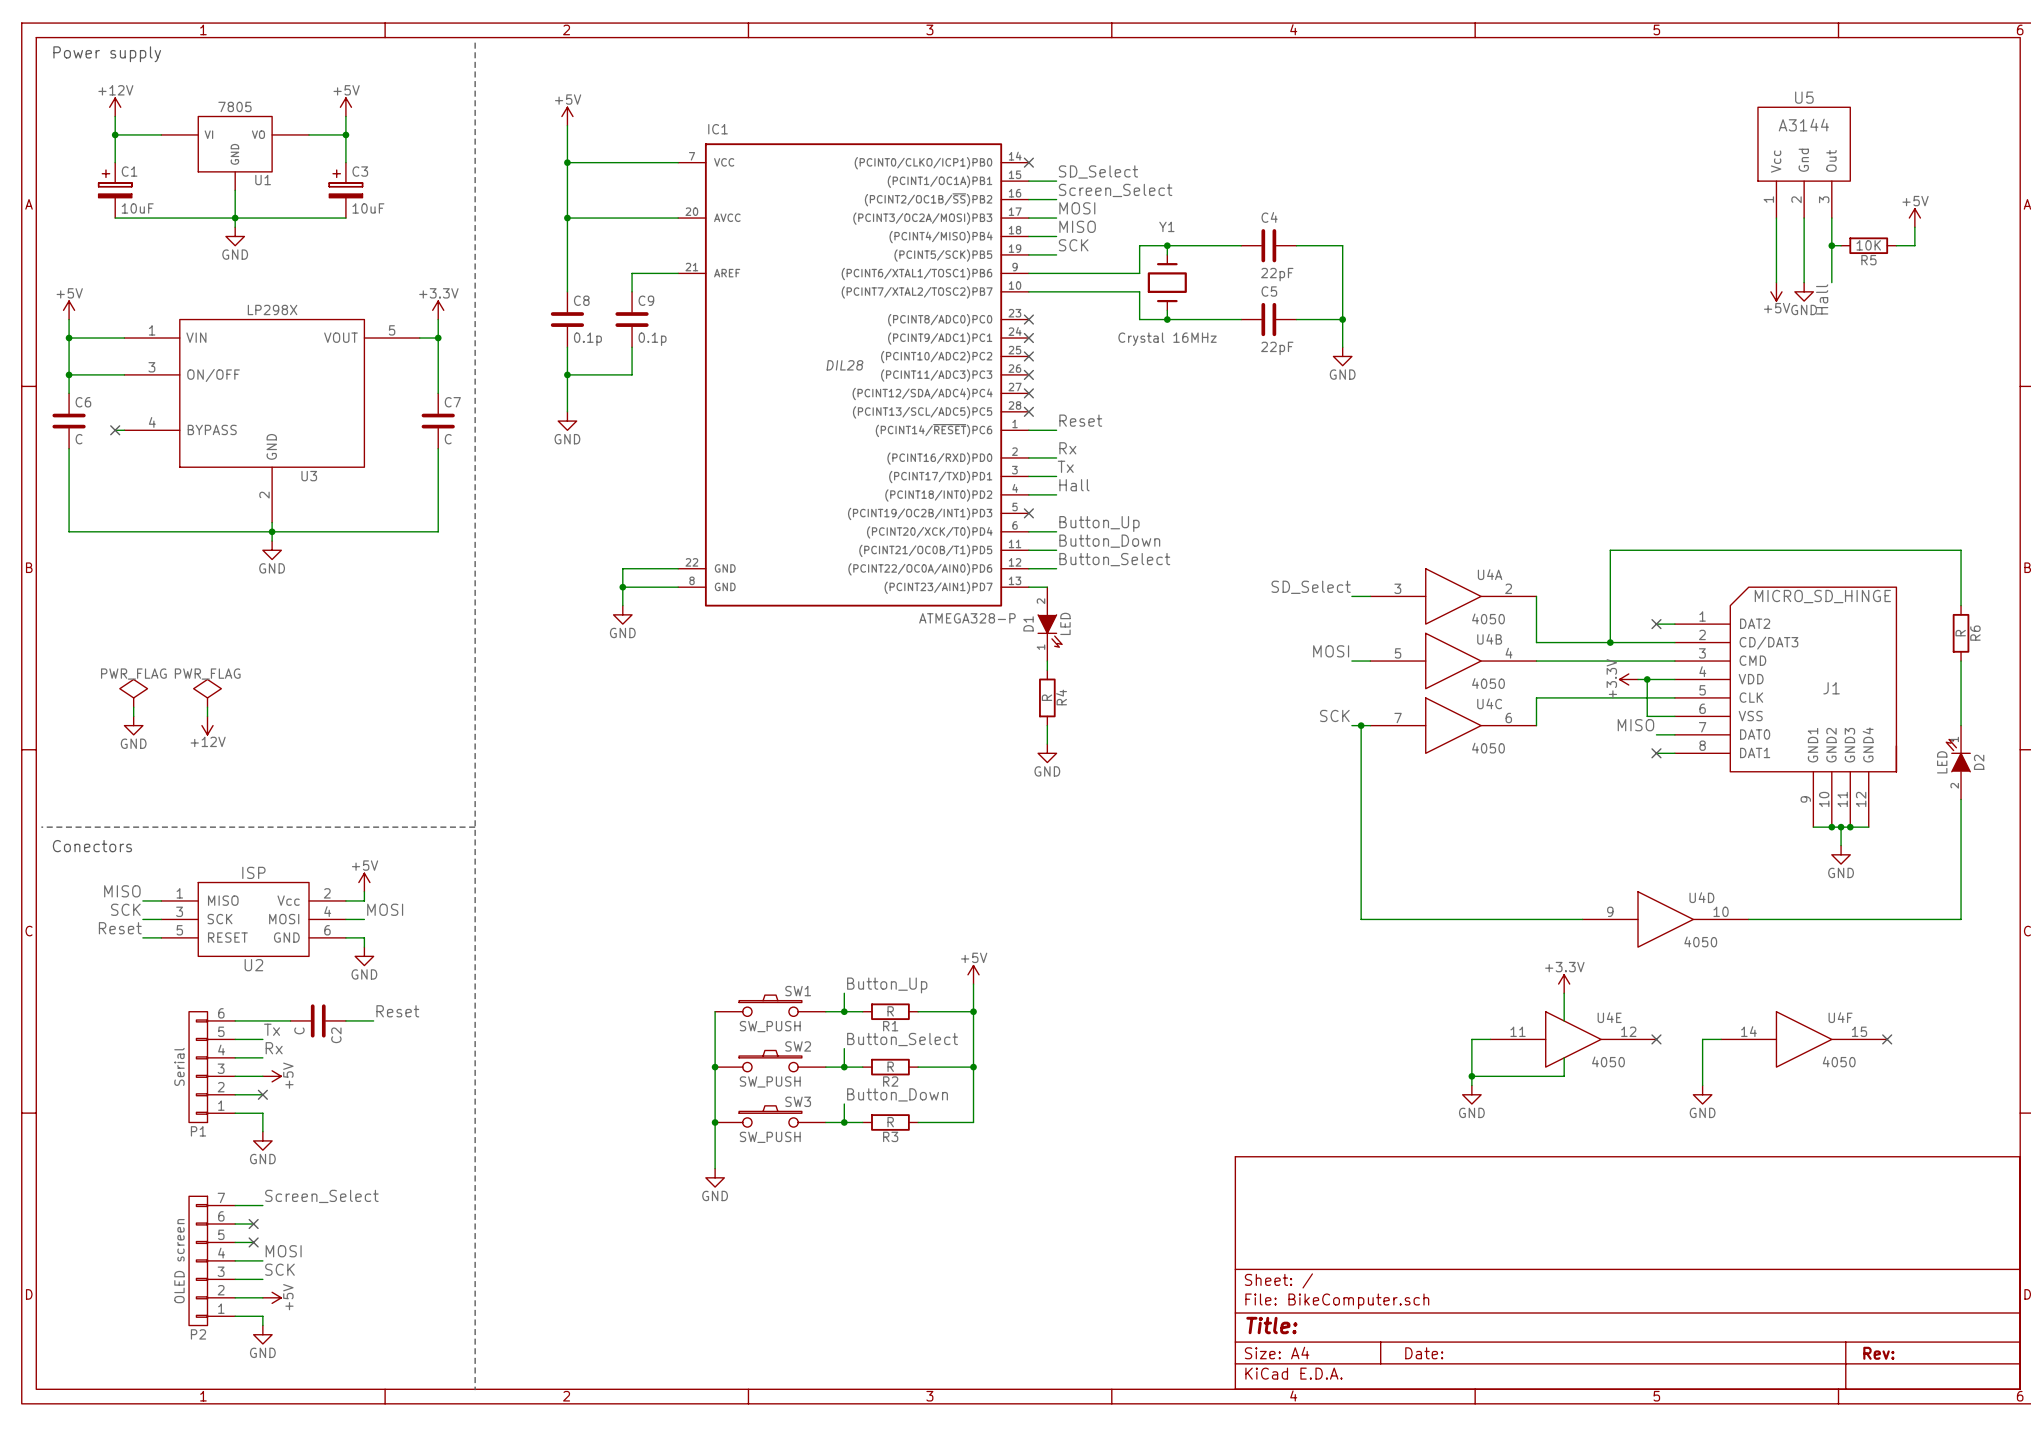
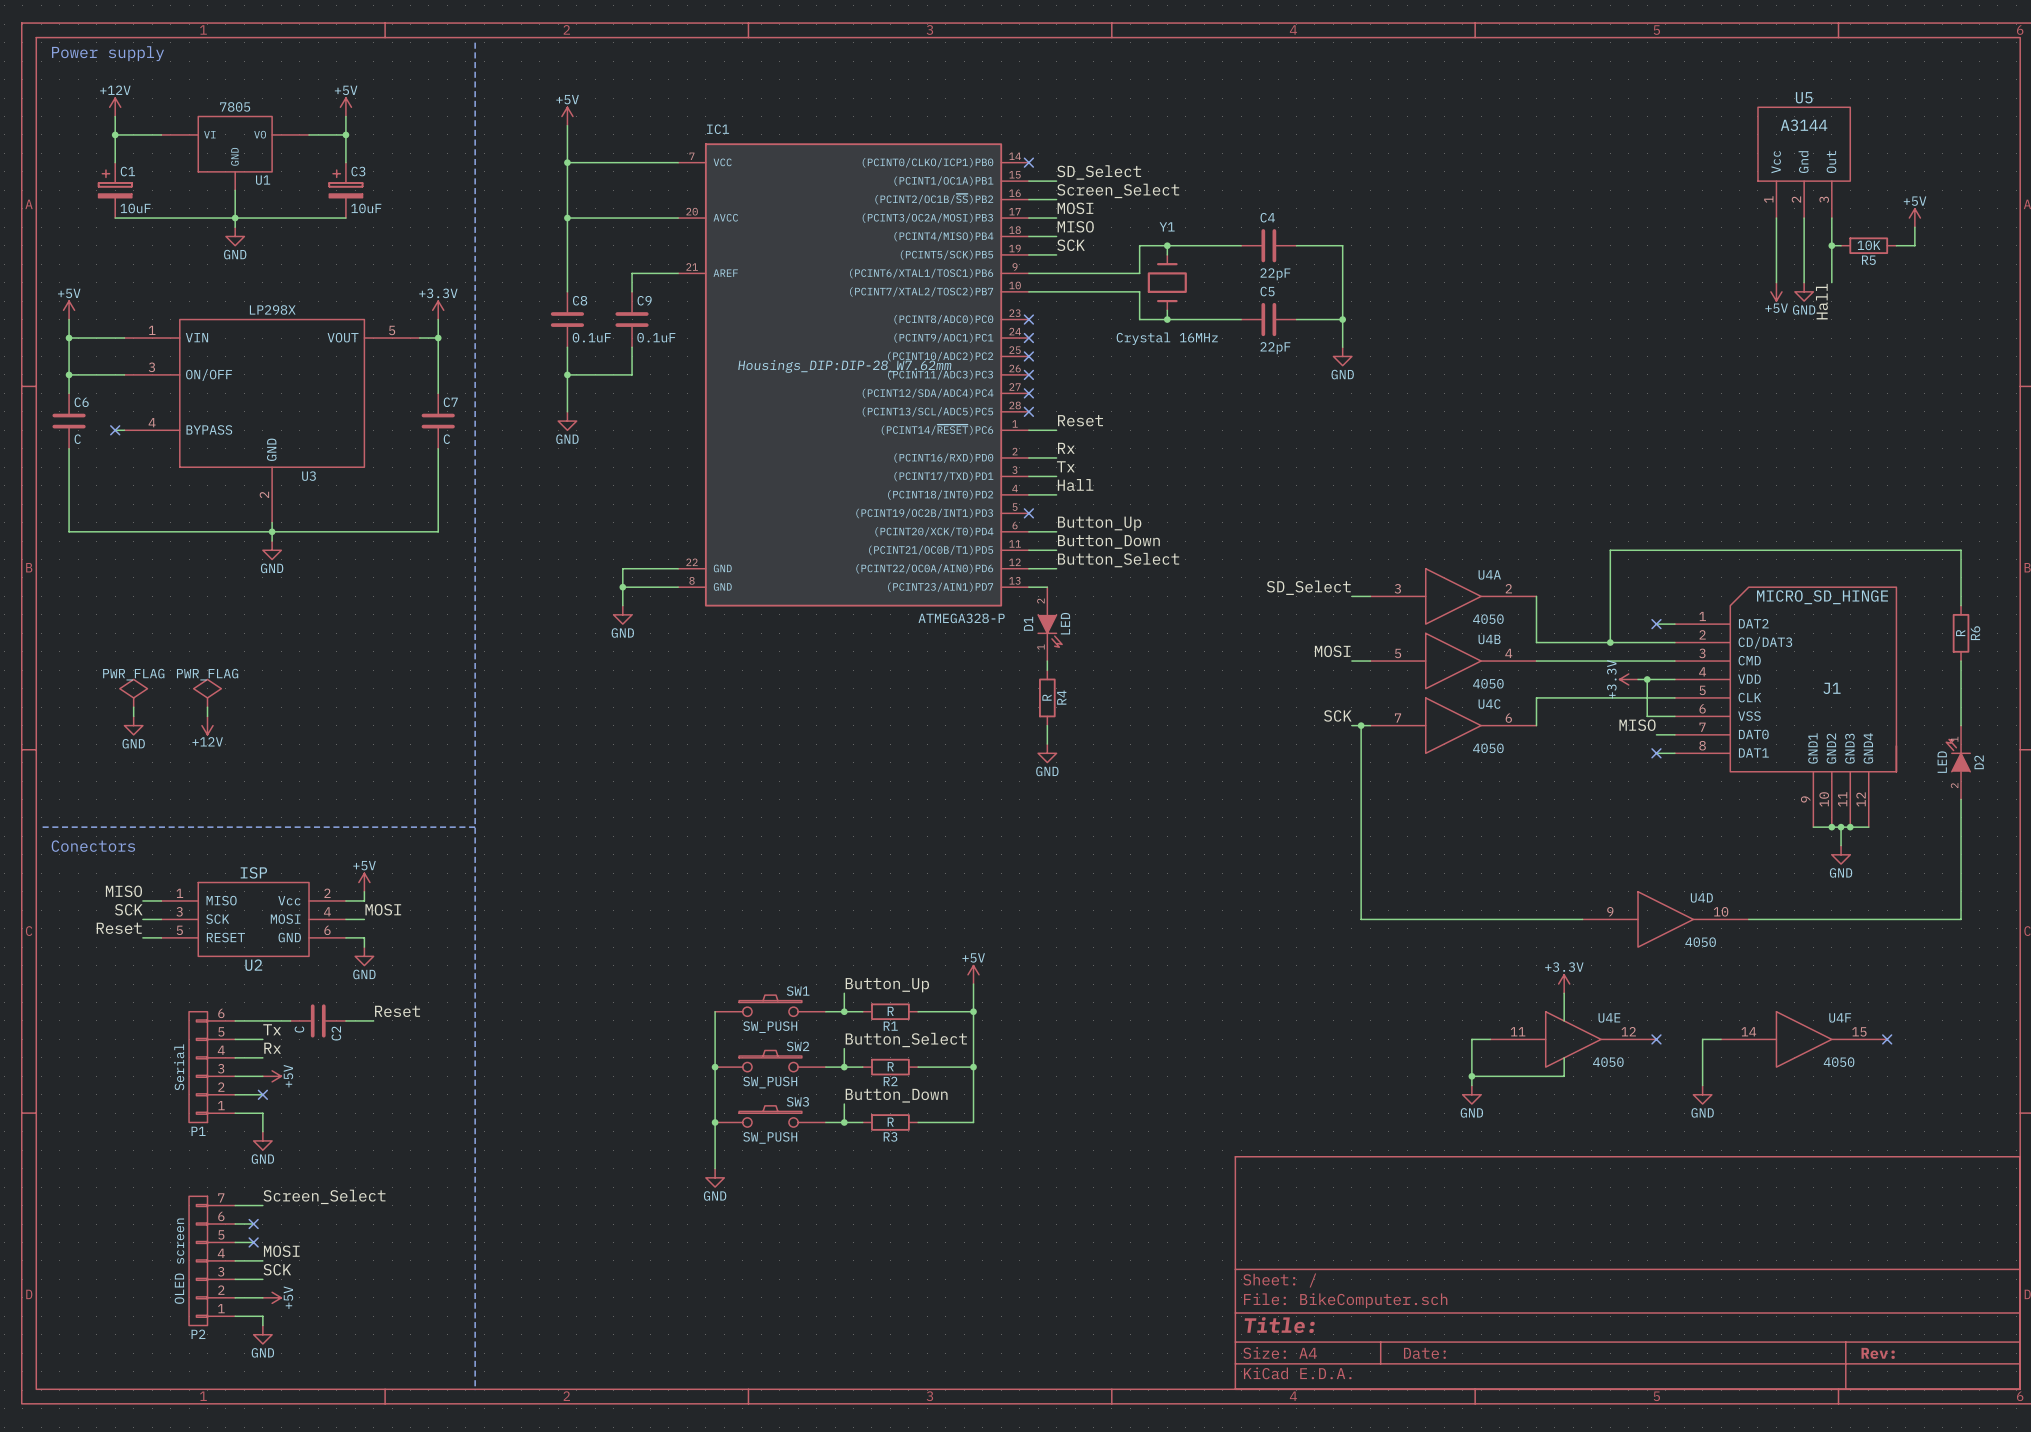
C8 value: 0.1p (587, 339) -> 0.1uF (591, 337)
C9 value: 0.1p (652, 339) -> 0.1uF (656, 337)
IC1 text: DIL28 (844, 365) -> Housings_DIP:DIP-28_W7.62mm (844, 366)

